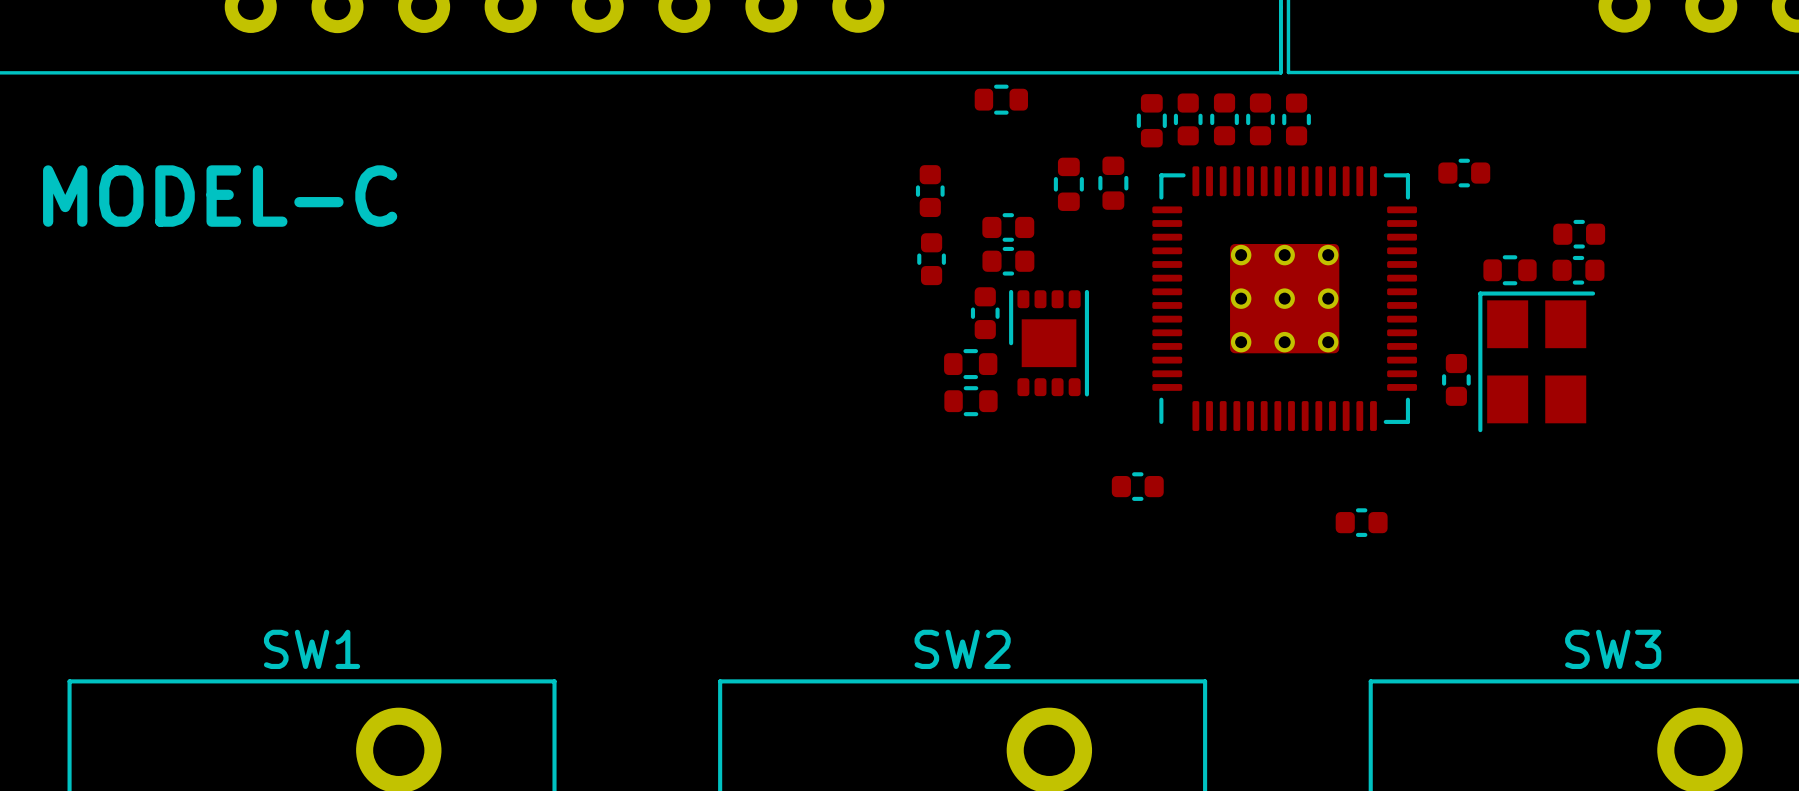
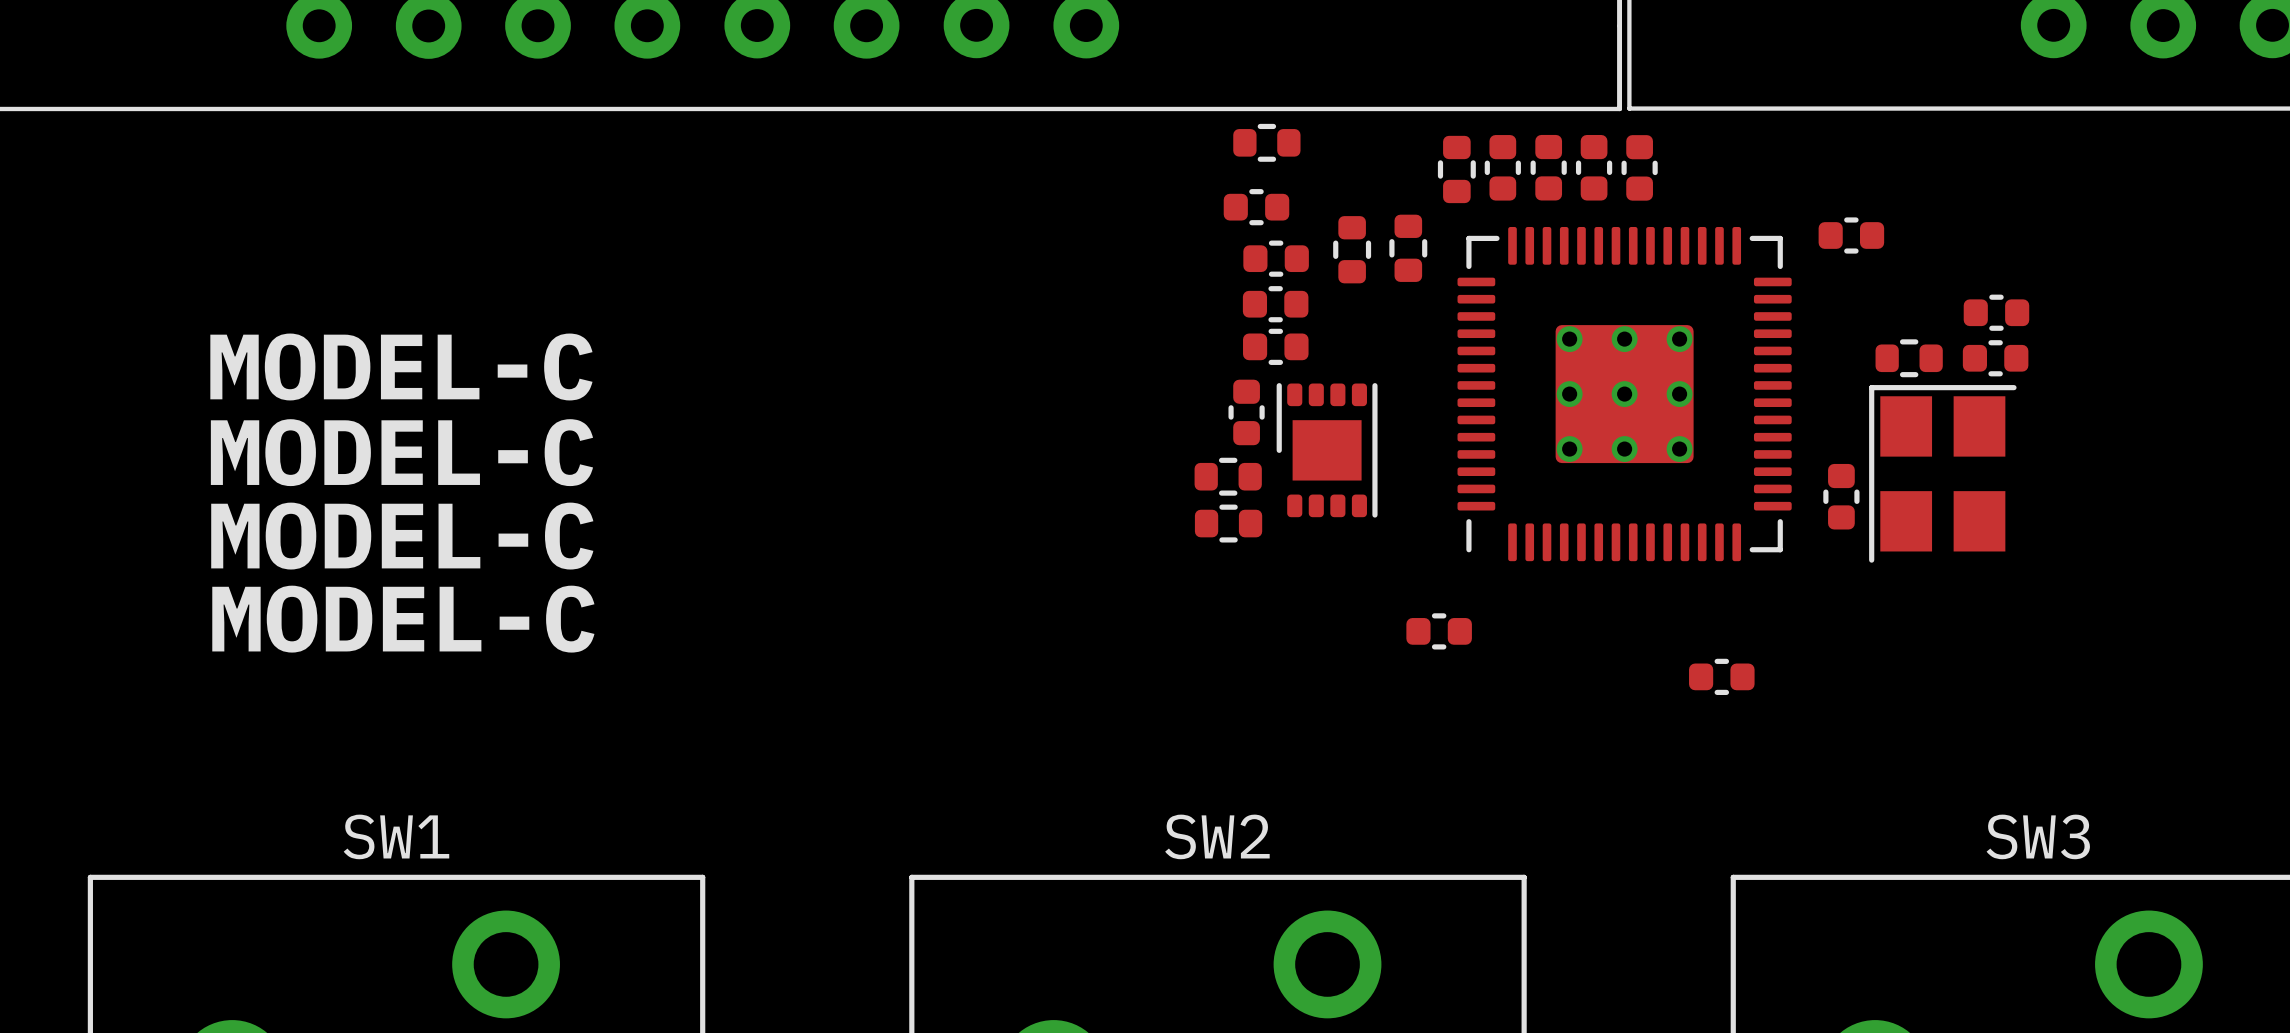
part: none -> (1256, 207)
part: (930, 191) -> none
part: none -> (1276, 258)
text position: MODEL-C (220, 196) -> MODEL-C (401, 366)
part: (931, 259) -> none
text: none -> MODEL-C (401, 452)
text: none -> MODEL-C (402, 536)
text: none -> MODEL-C (403, 619)

